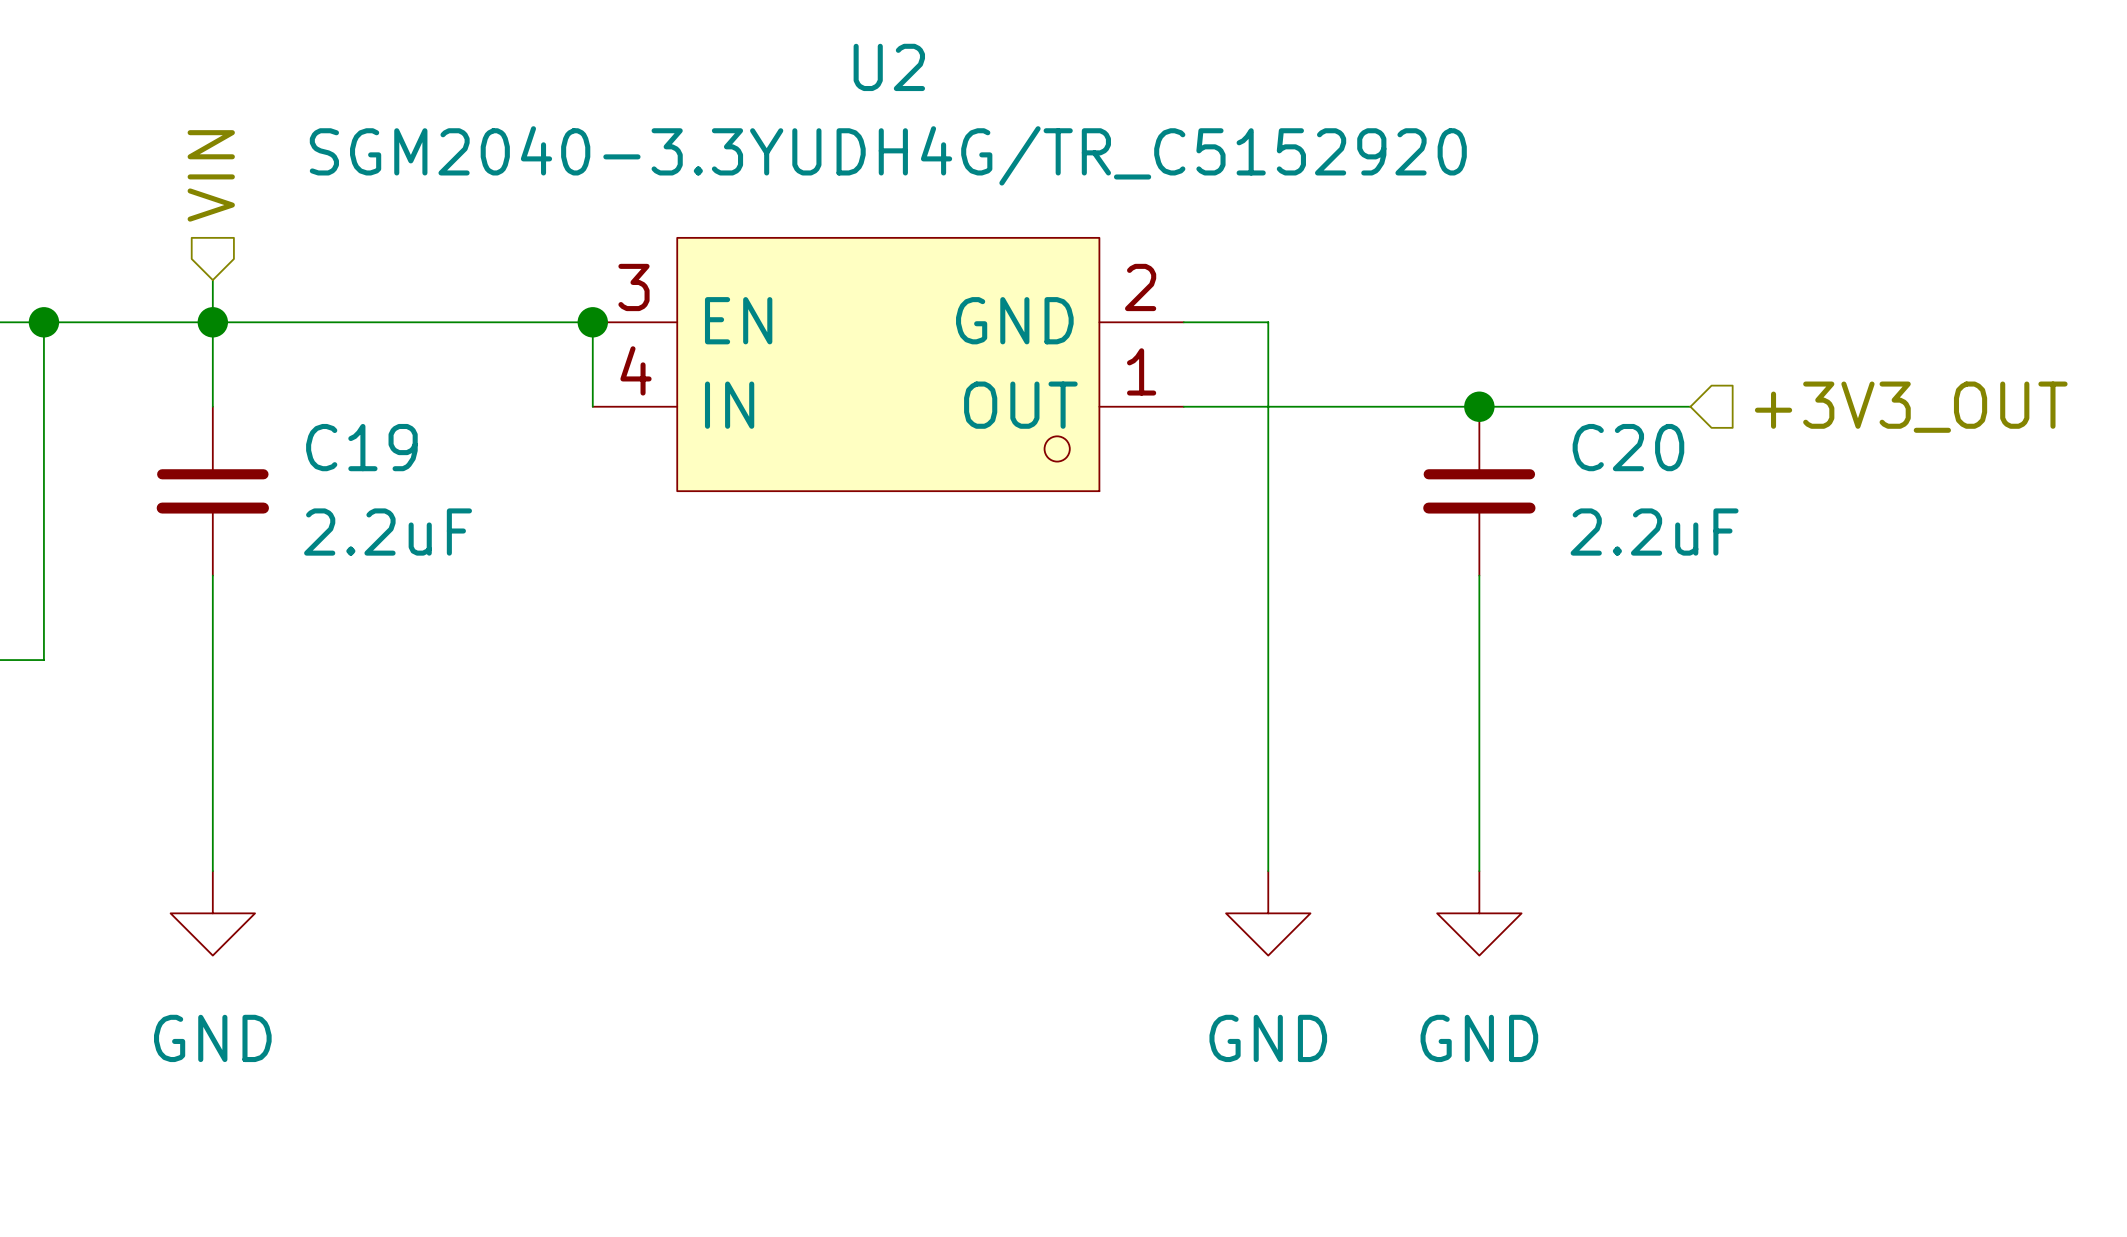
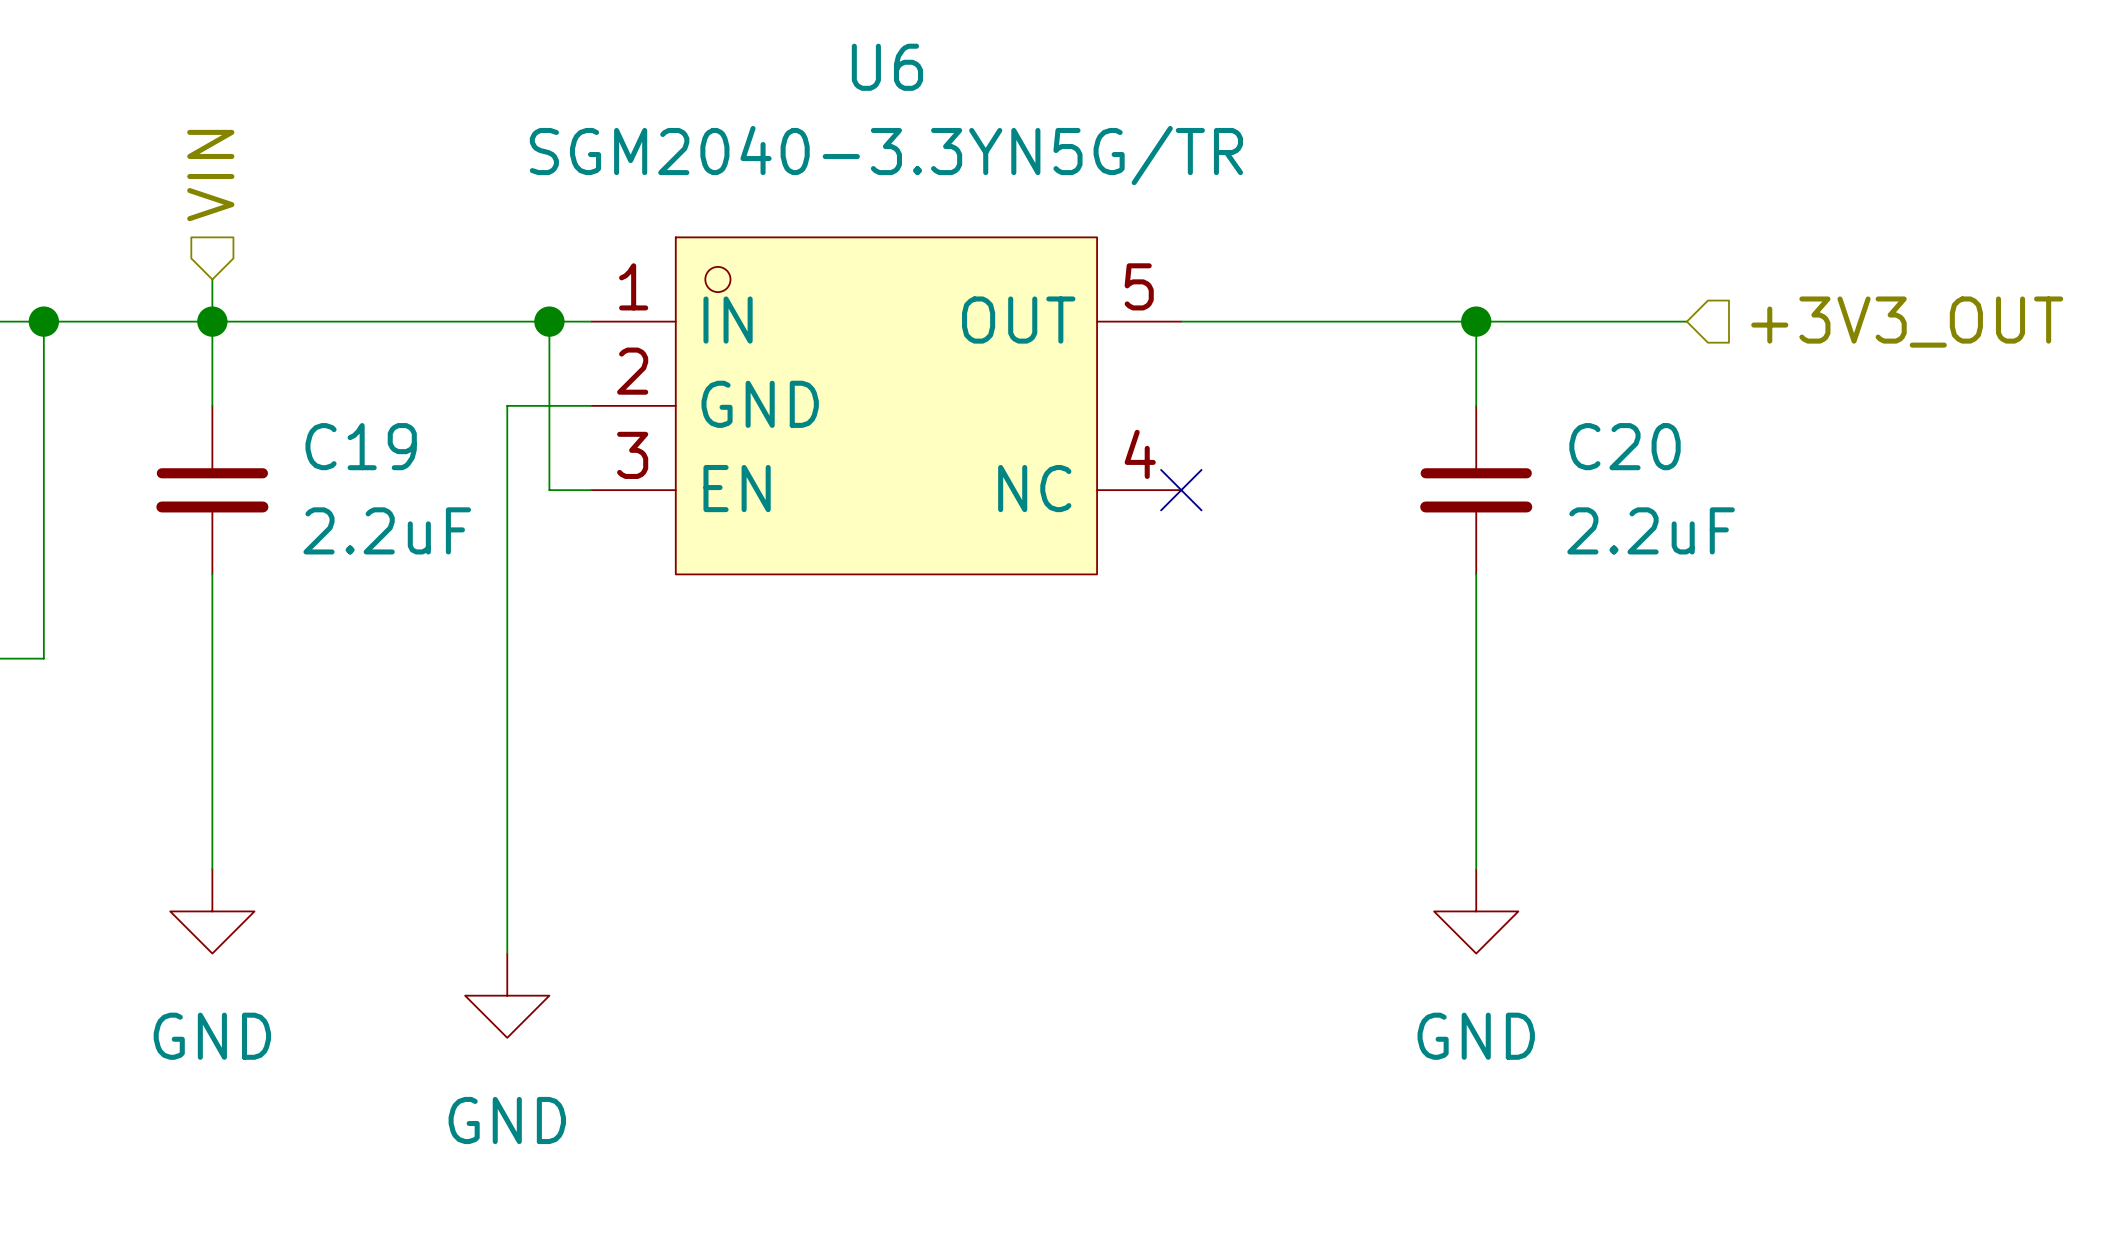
wire: none -> (549, 321) (549, 490) (591, 490)
wire: (592, 322) (592, 406) -> (507, 953) (507, 405) (591, 405)
junction position: (592, 322) -> (549, 321)
wire: (1268, 322) (1268, 871) -> (1265, 321) (1686, 321)
wire: none -> (1476, 321) (1476, 405)
U2: SGM2040-3.3YUDH4G/TR_C5152920 (888, 364) -> none
U6: none -> SGM2040-3.3YN5G/TR (886, 405)
wire: (1183, 406) (1690, 406) -> none
junction position: (1479, 406) -> (1476, 321)
hierarchical label position: +3V3_OUT (1911, 407) -> +3V3_OUT (1907, 322)
no-connect mark: none -> (1181, 490)
power symbol position: GND (1268, 913) -> GND (507, 995)

